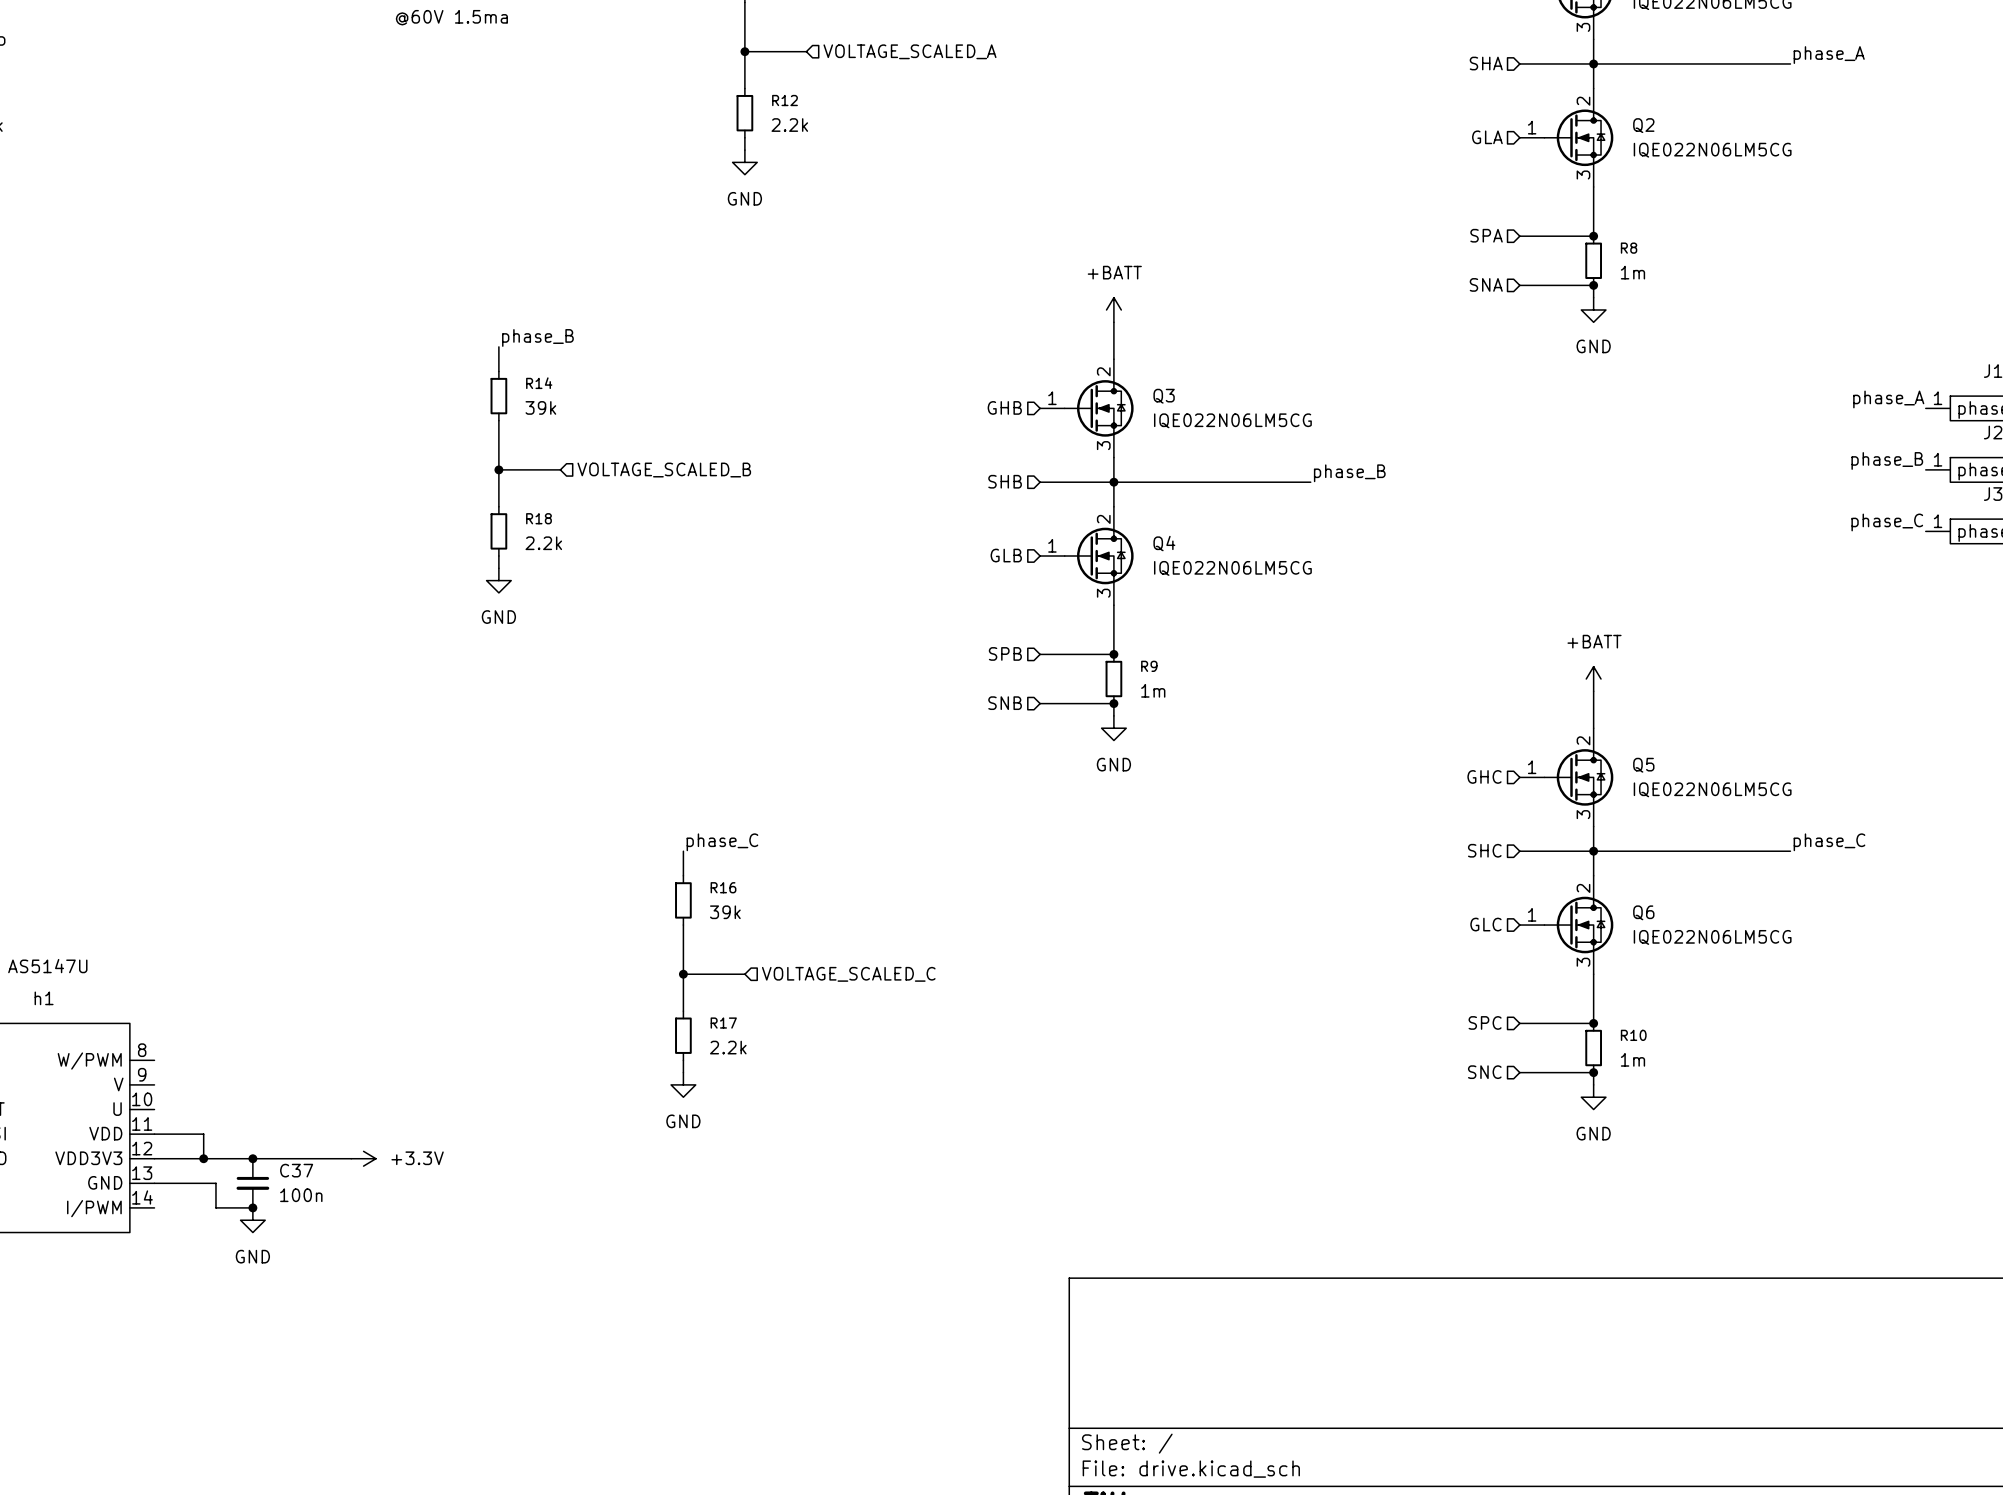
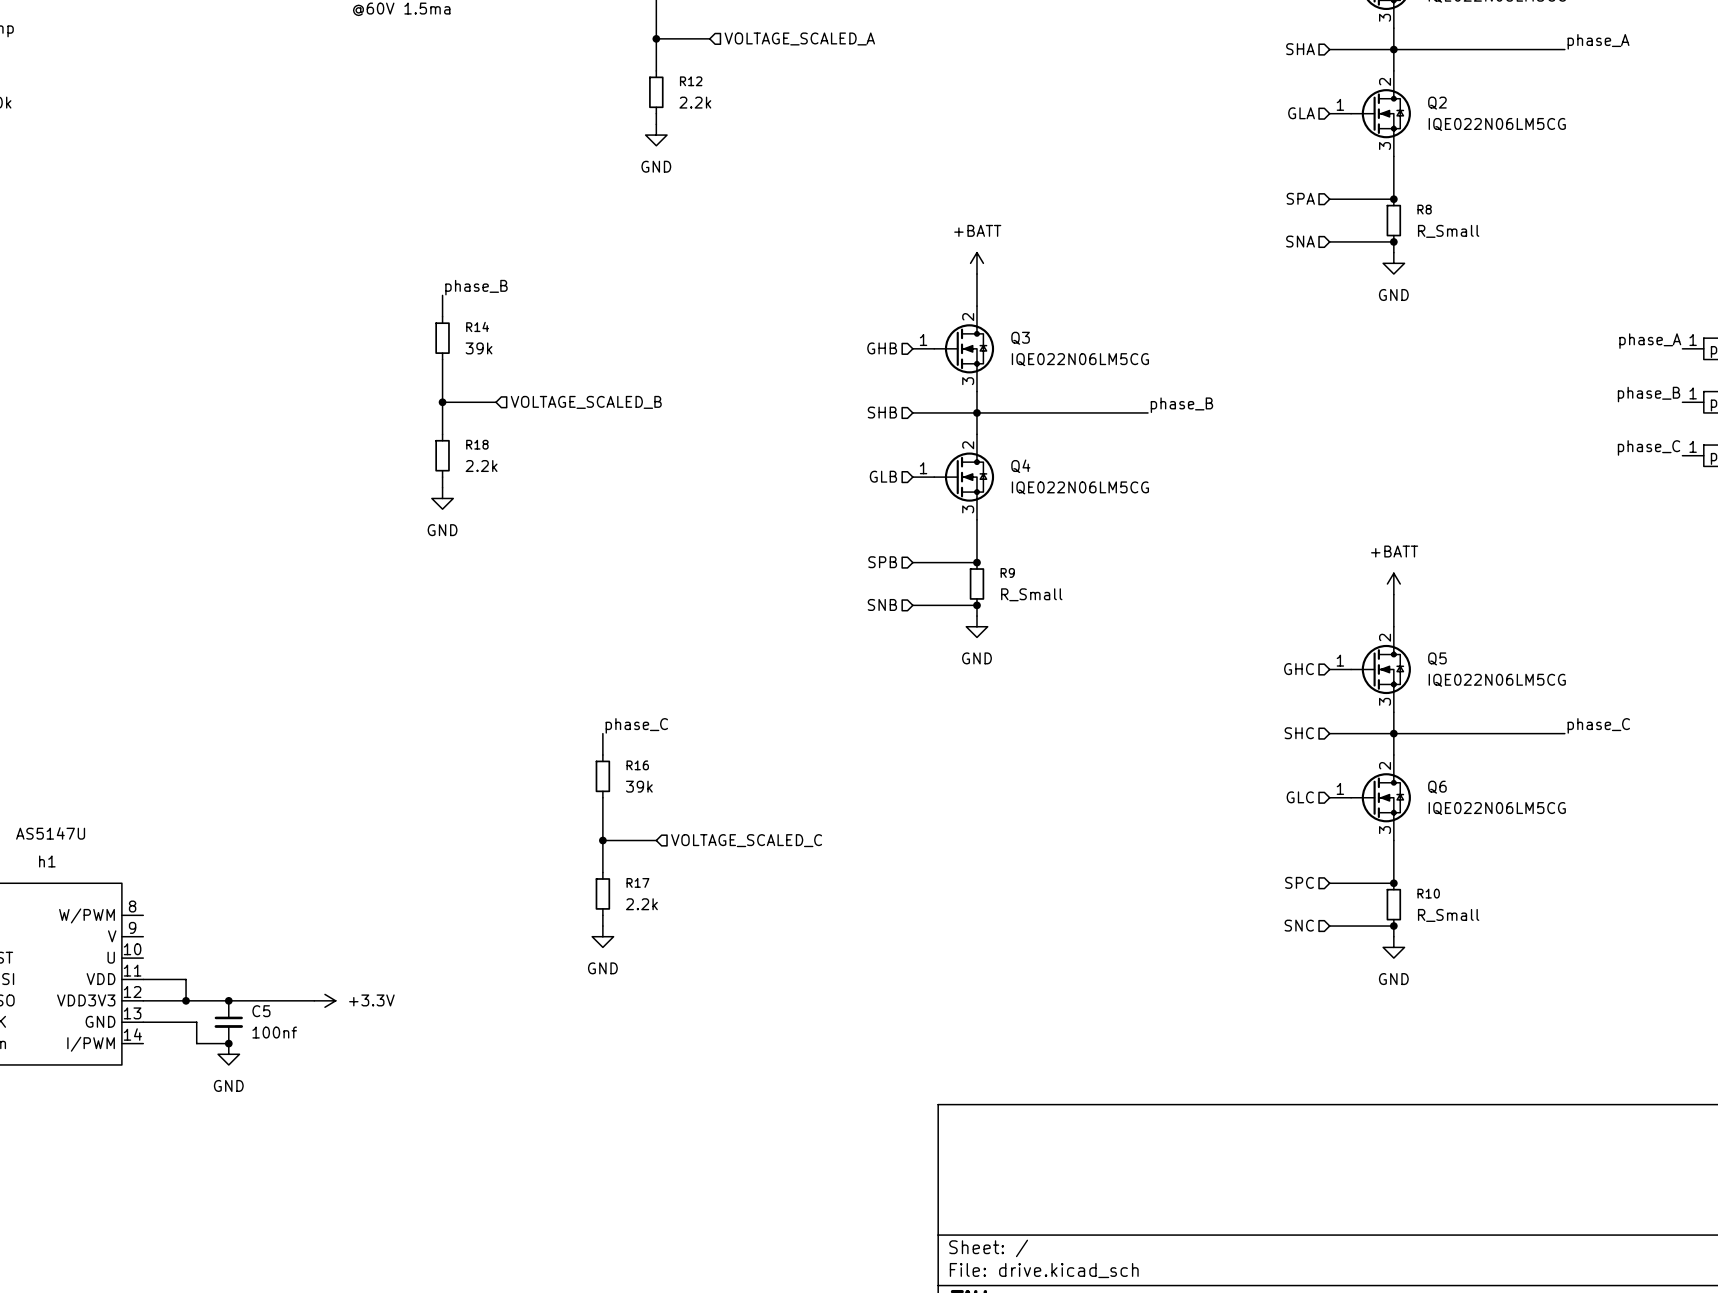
R8 value: 1m (1632, 272) -> R_Small (1448, 231)
R9 value: 1m (1153, 690) -> R_Small (1031, 594)
R10 value: 1m (1632, 1059) -> R_Small (1448, 915)
C37 name: C37 (296, 1170) -> C5 (261, 1011)
C37 value: 100n (301, 1195) -> 100nf (274, 1032)

